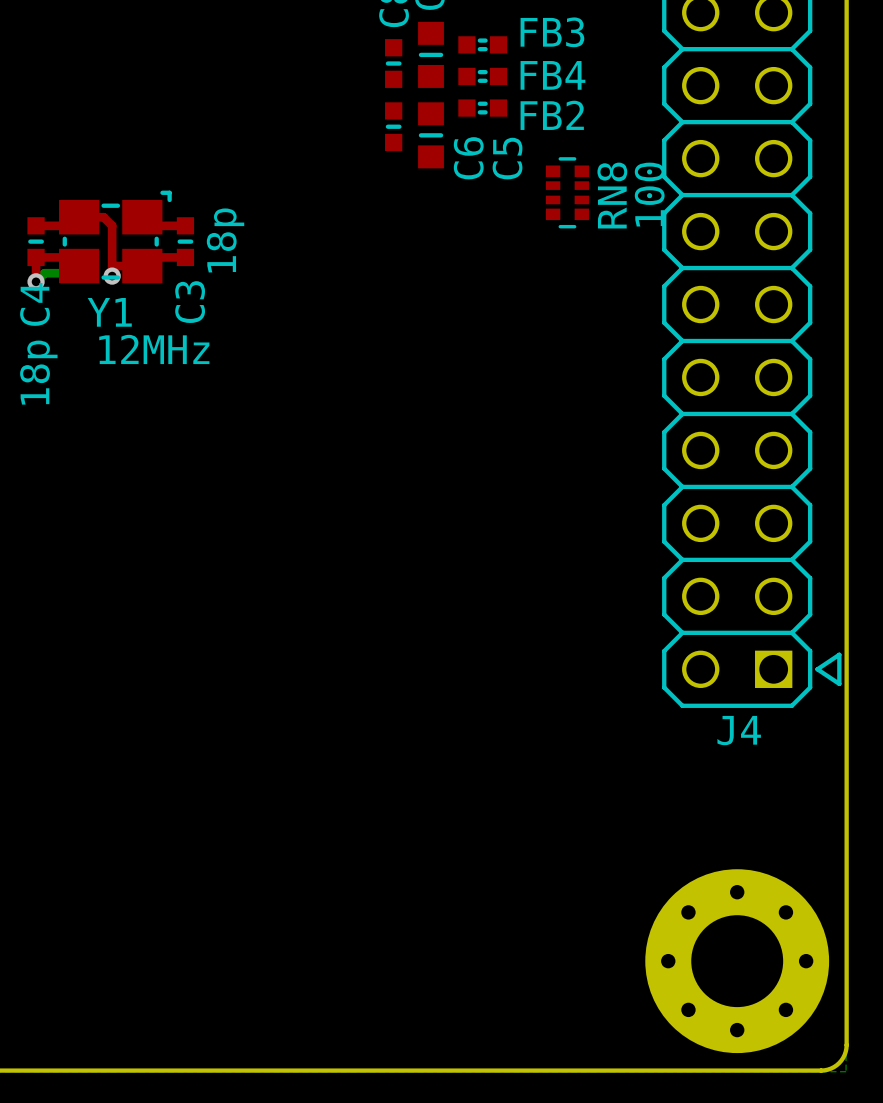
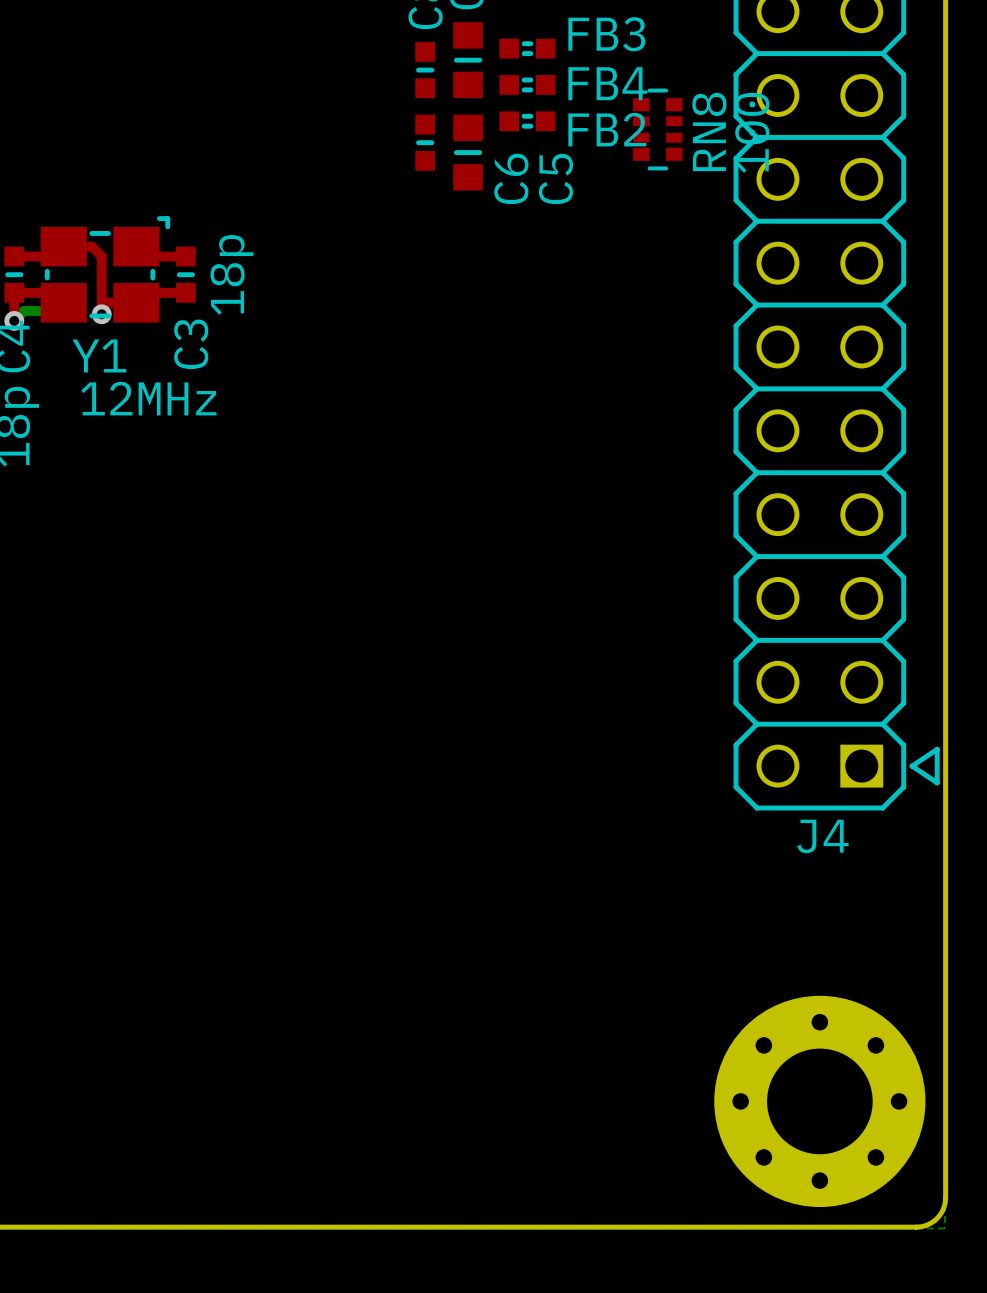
RN8 position: (567, 192) -> (657, 129)

